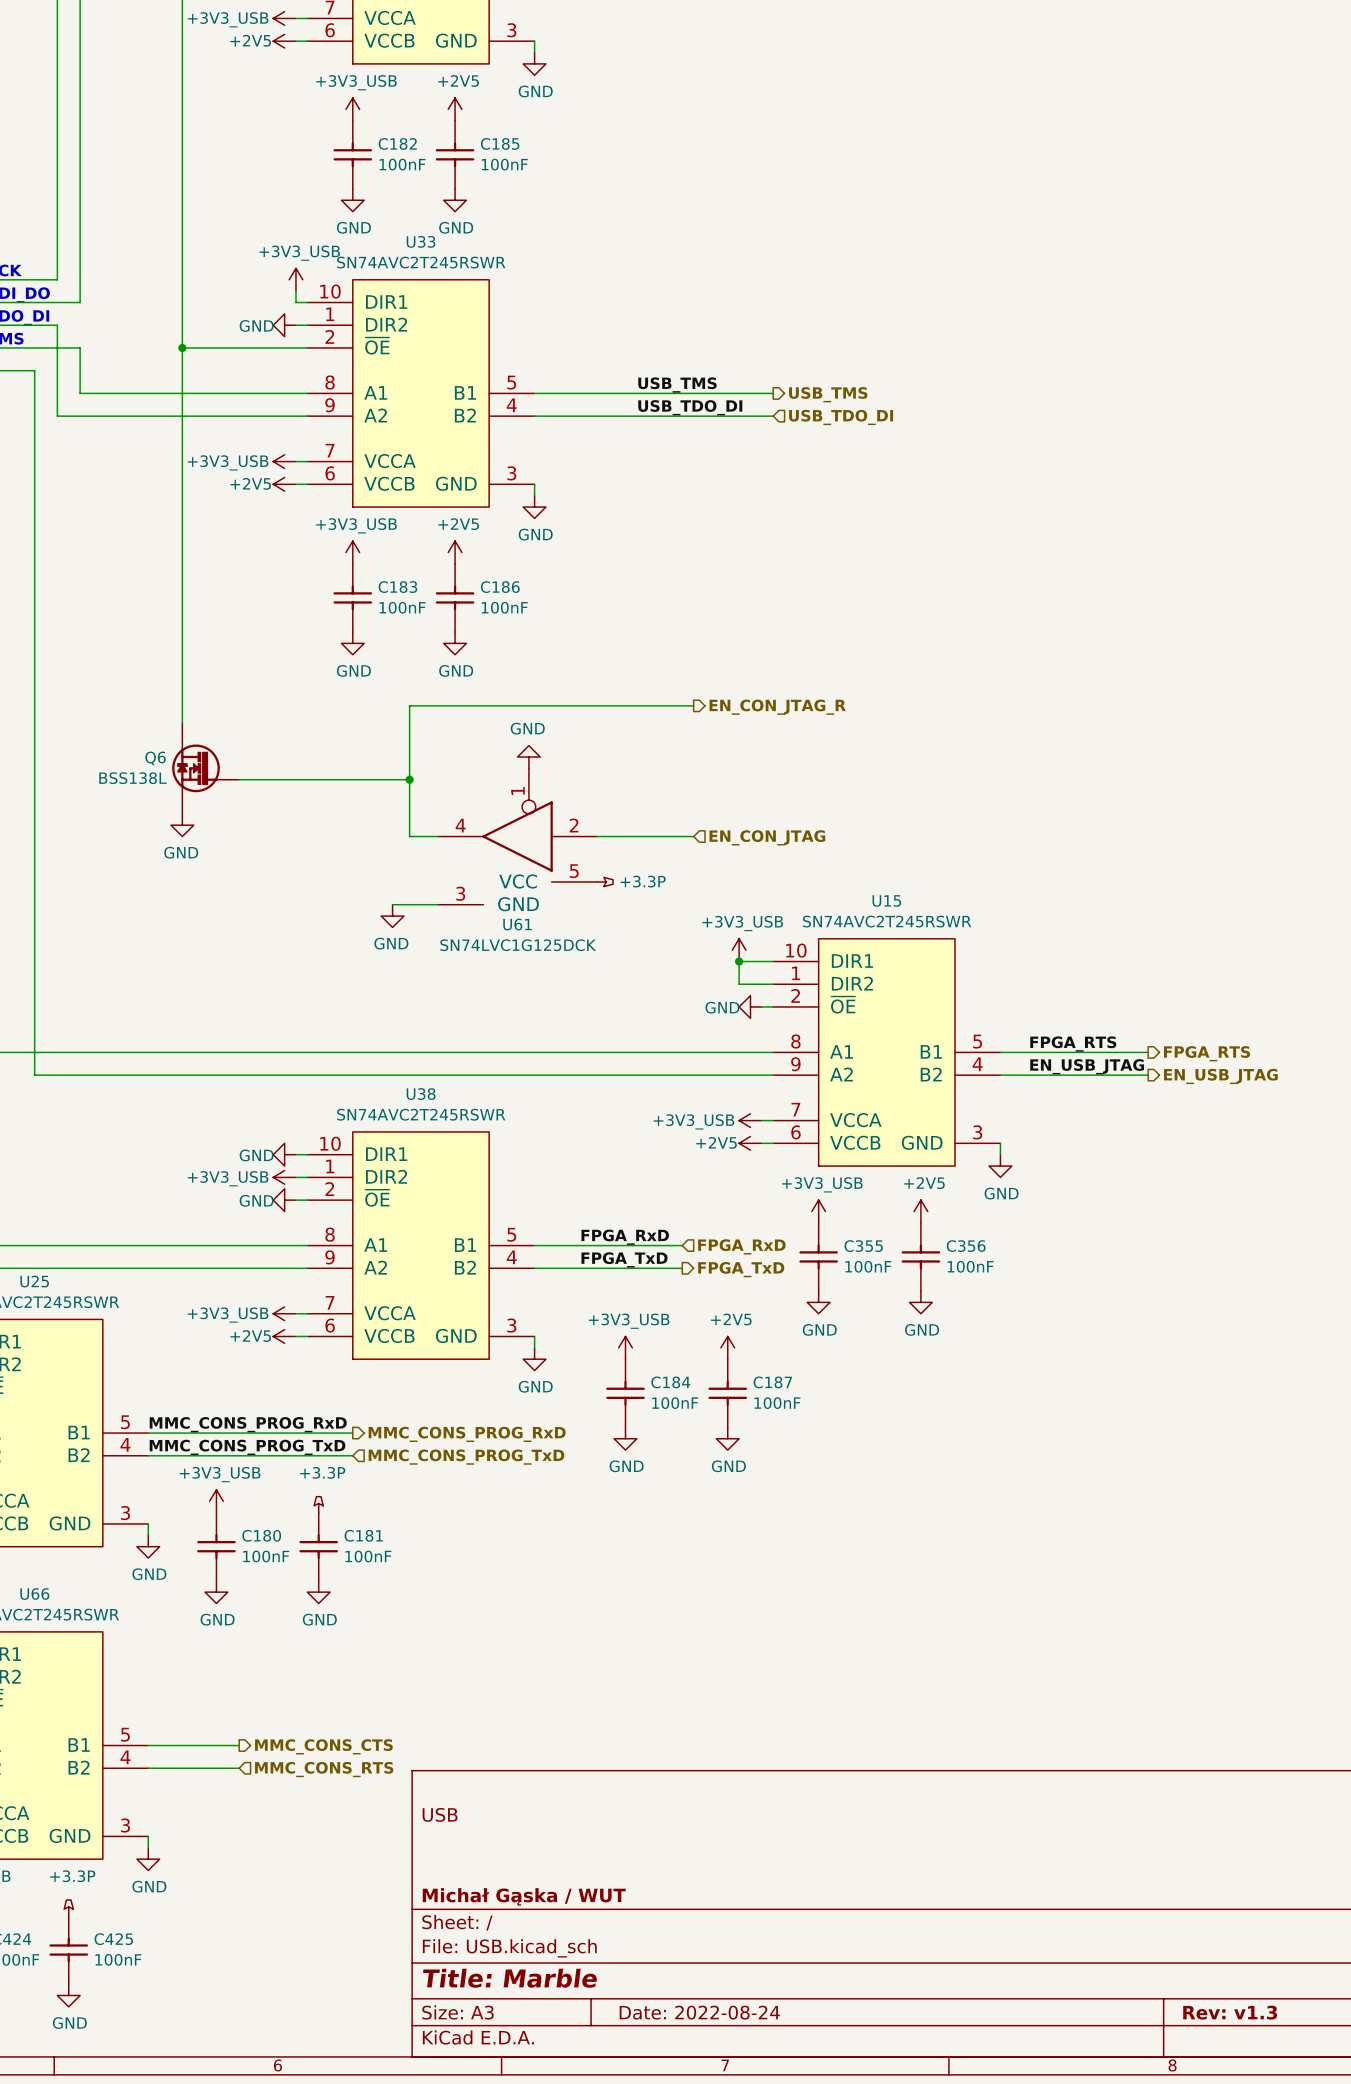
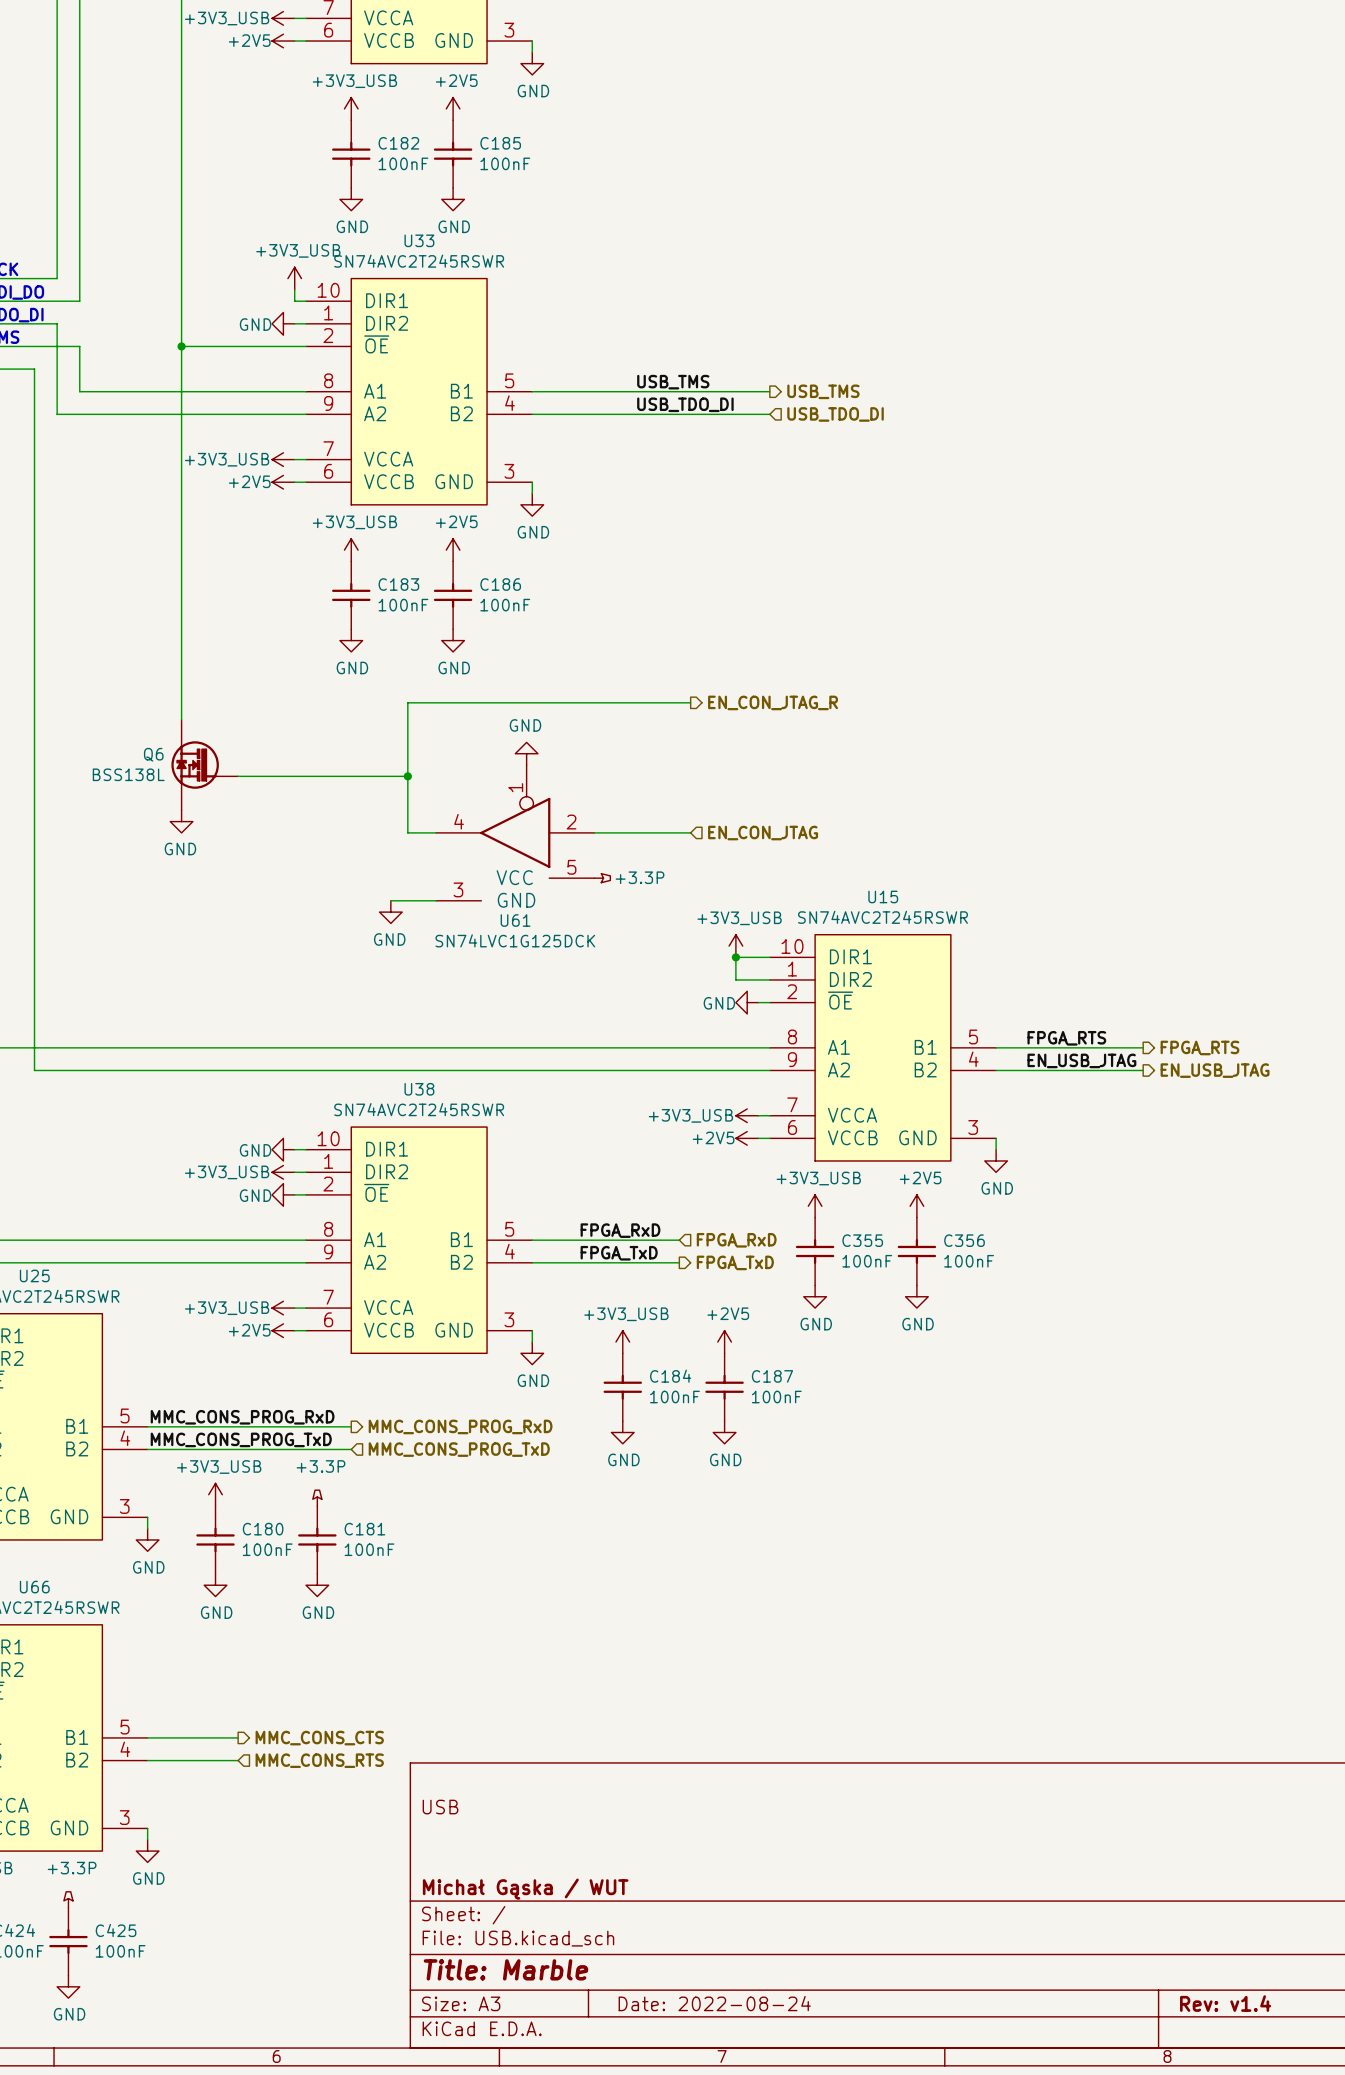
title block: Rev: v1.3 (1230, 2012) -> Rev: v1.4 (1225, 2003)

